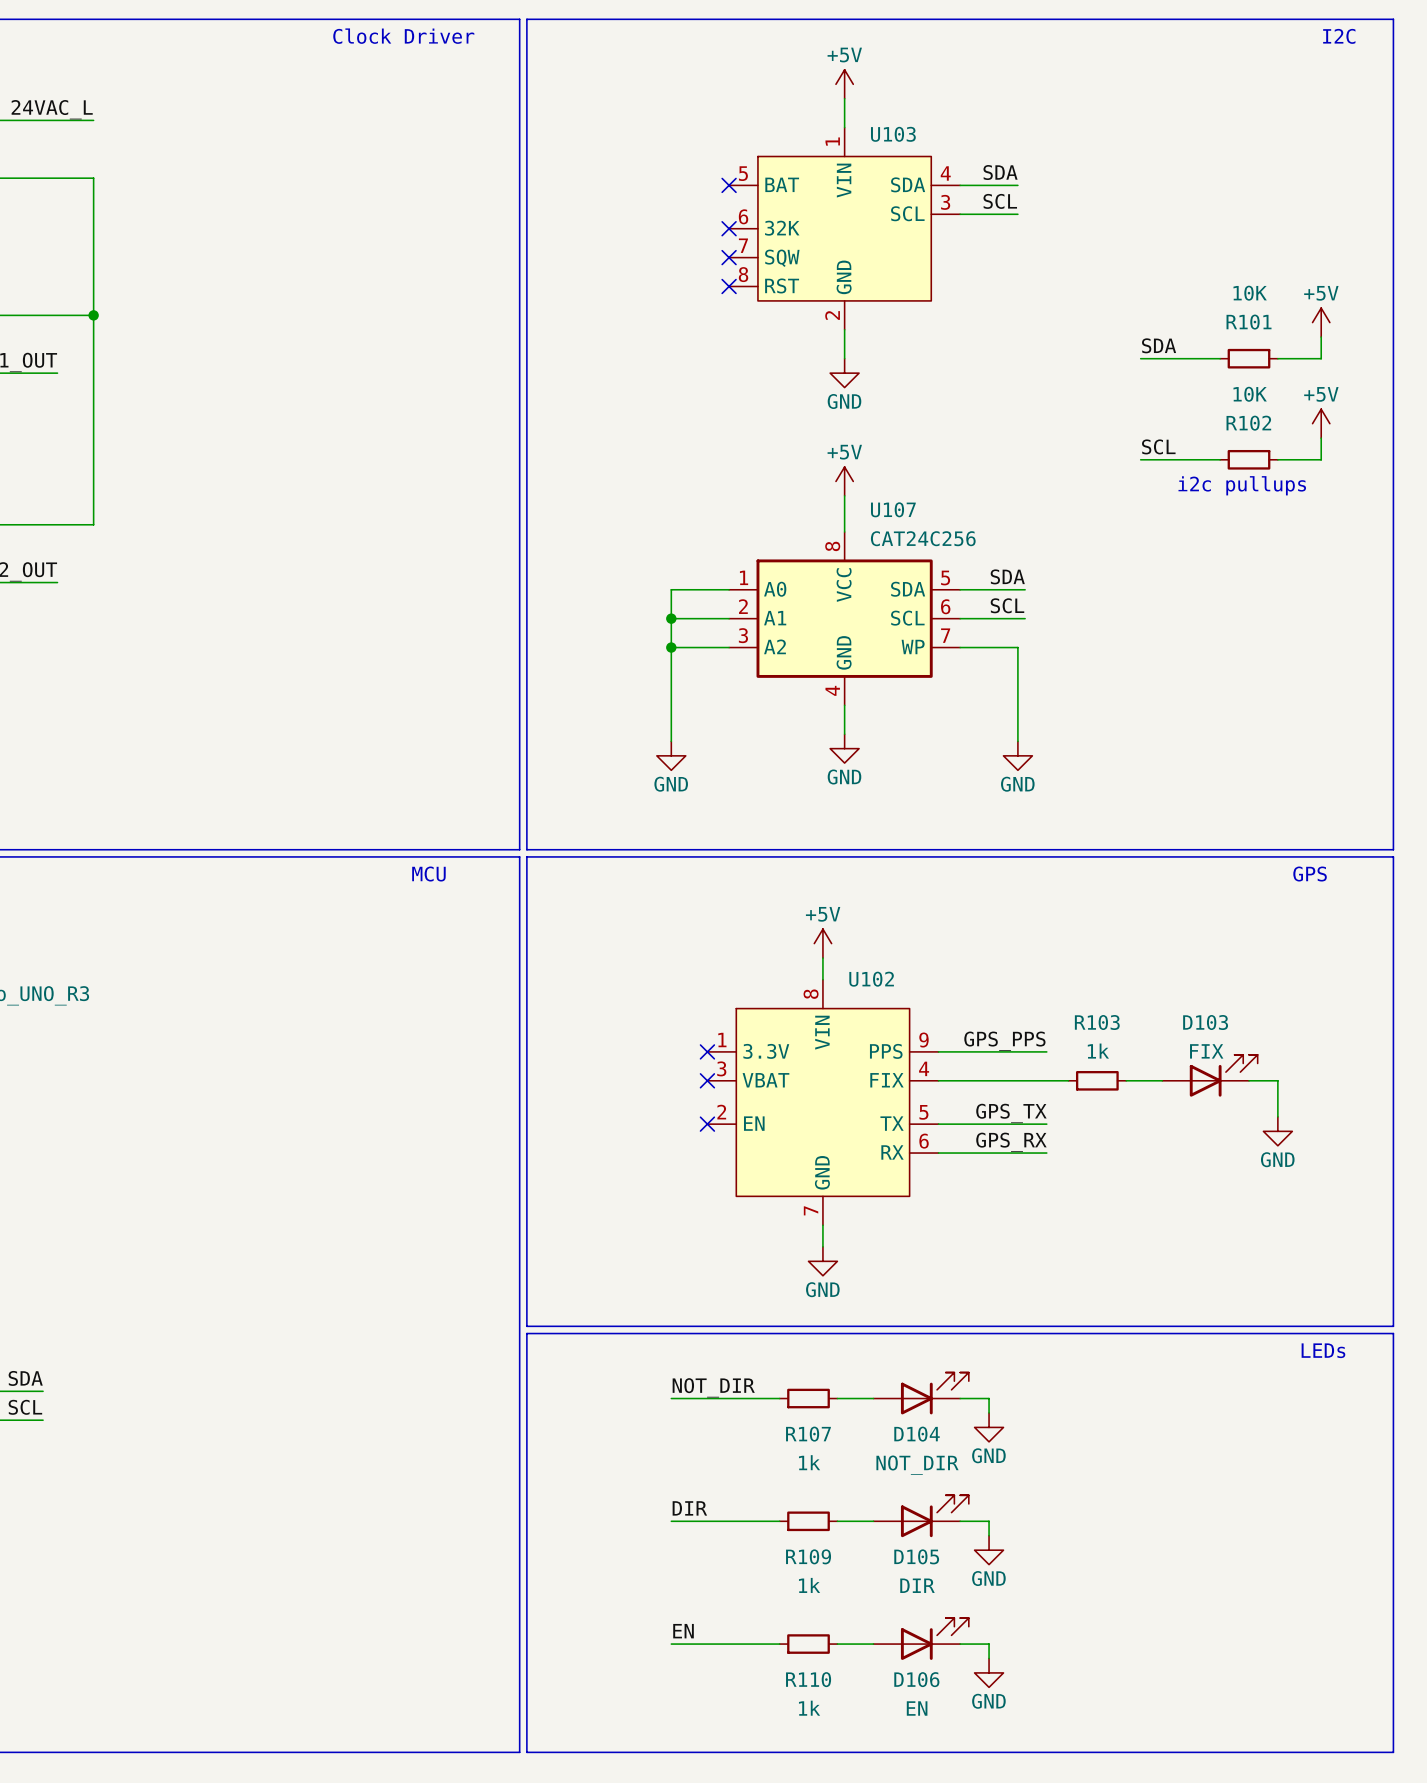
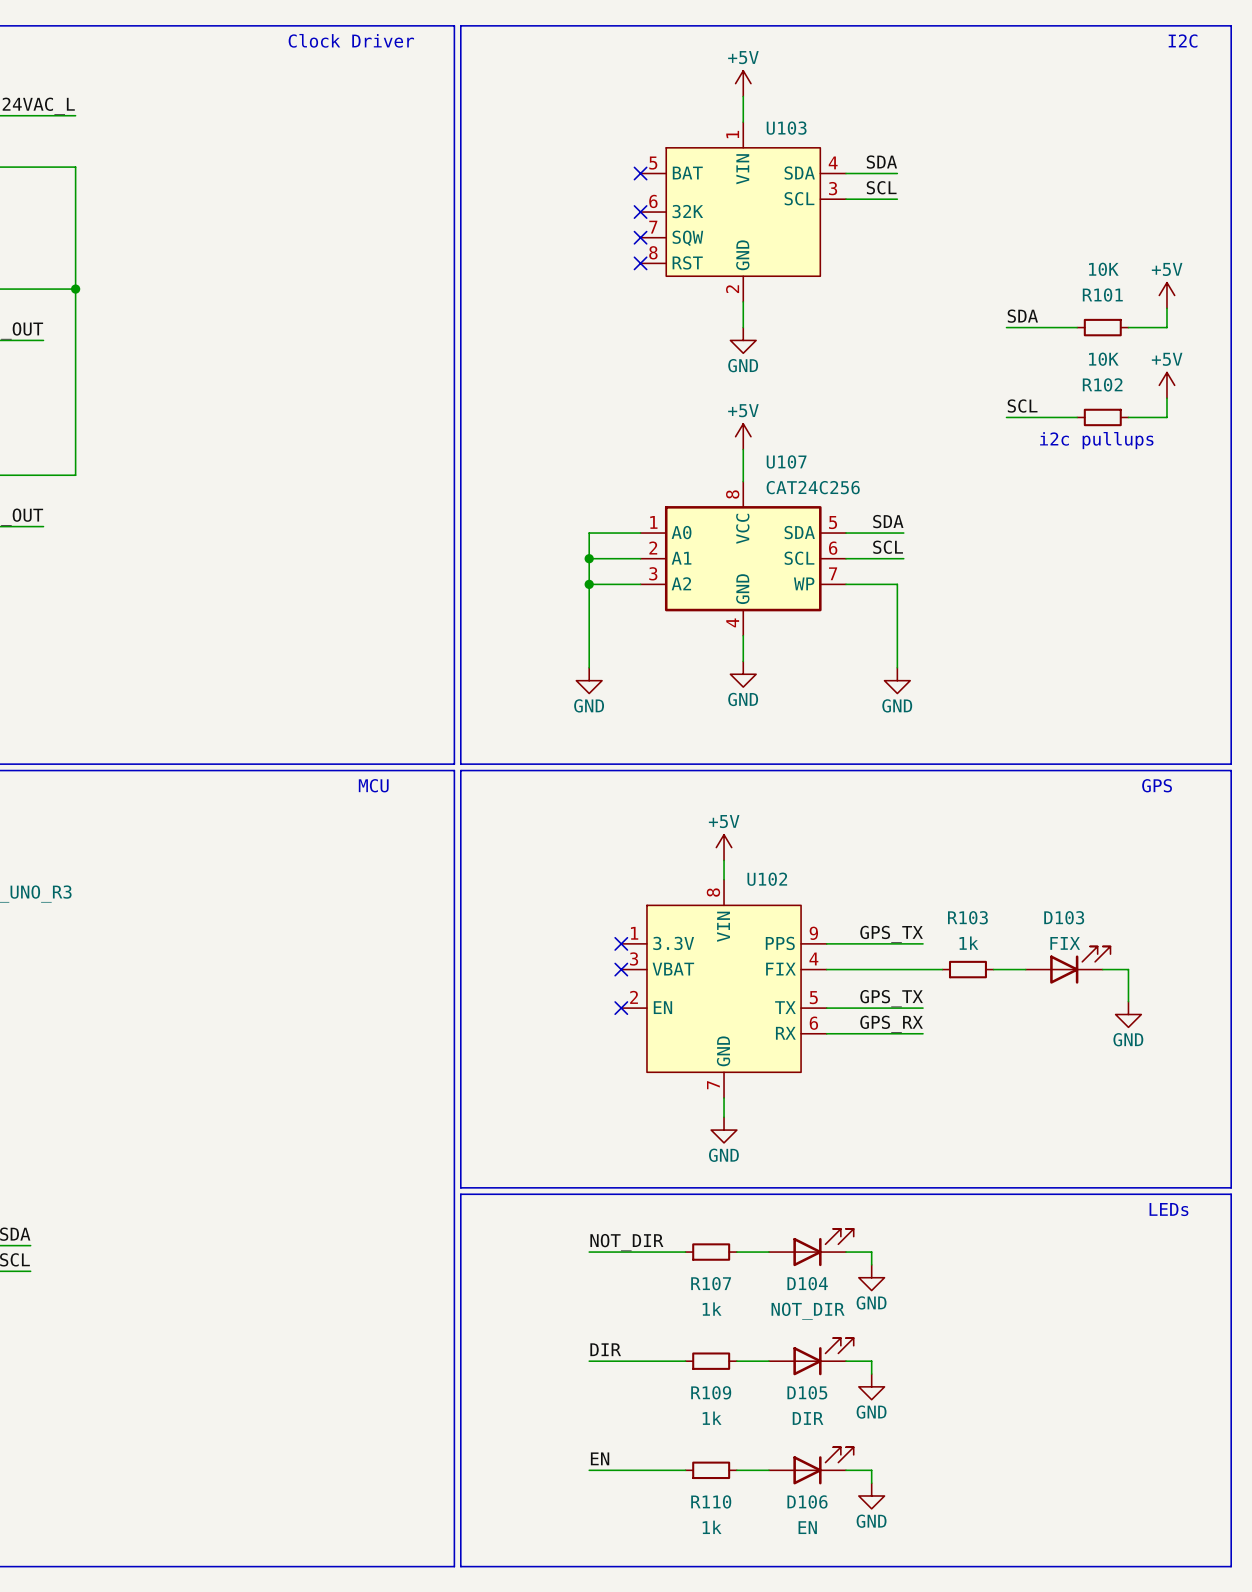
label: GPS_PPS (1004, 1041) -> GPS_TX (891, 934)

